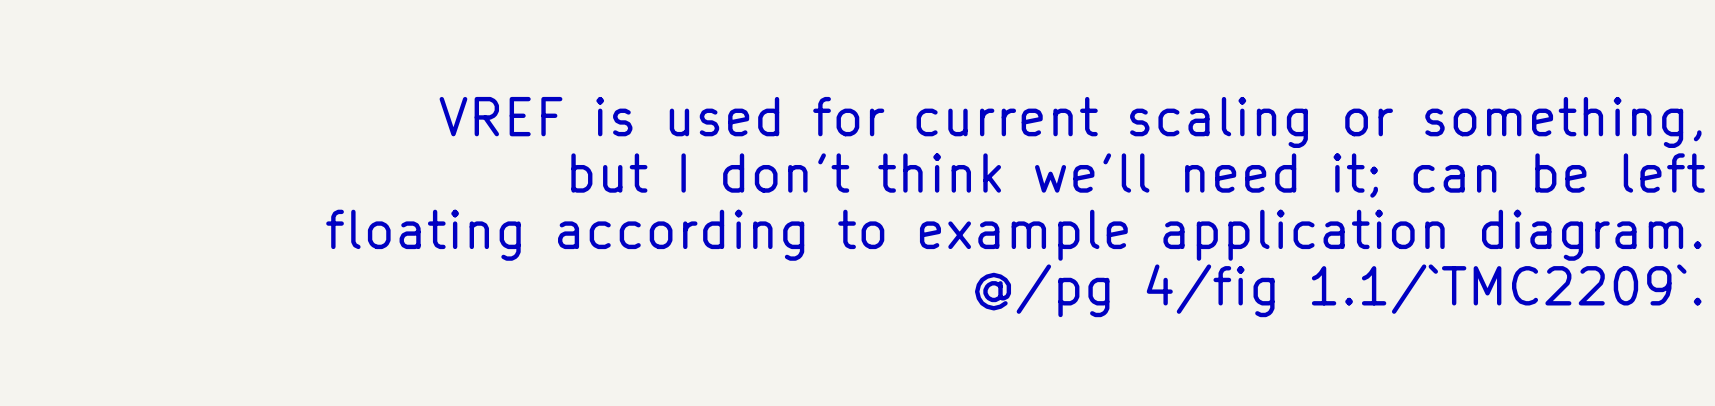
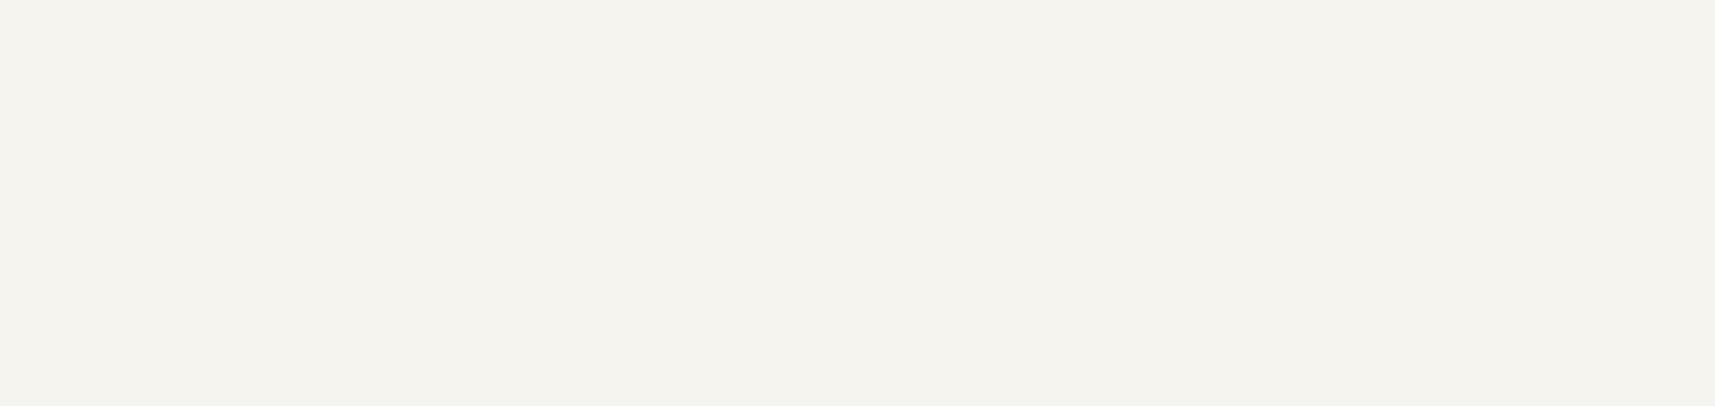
text: VREF is used for current scaling or something, (1070, 122) -> none
text: but I don't think we'll need it; can be left (1138, 175) -> none
text: floating according to example application diagram. (1013, 235) -> none
text: @/pg 4/fig 1.1/`TMC2209`. (1338, 290) -> none

